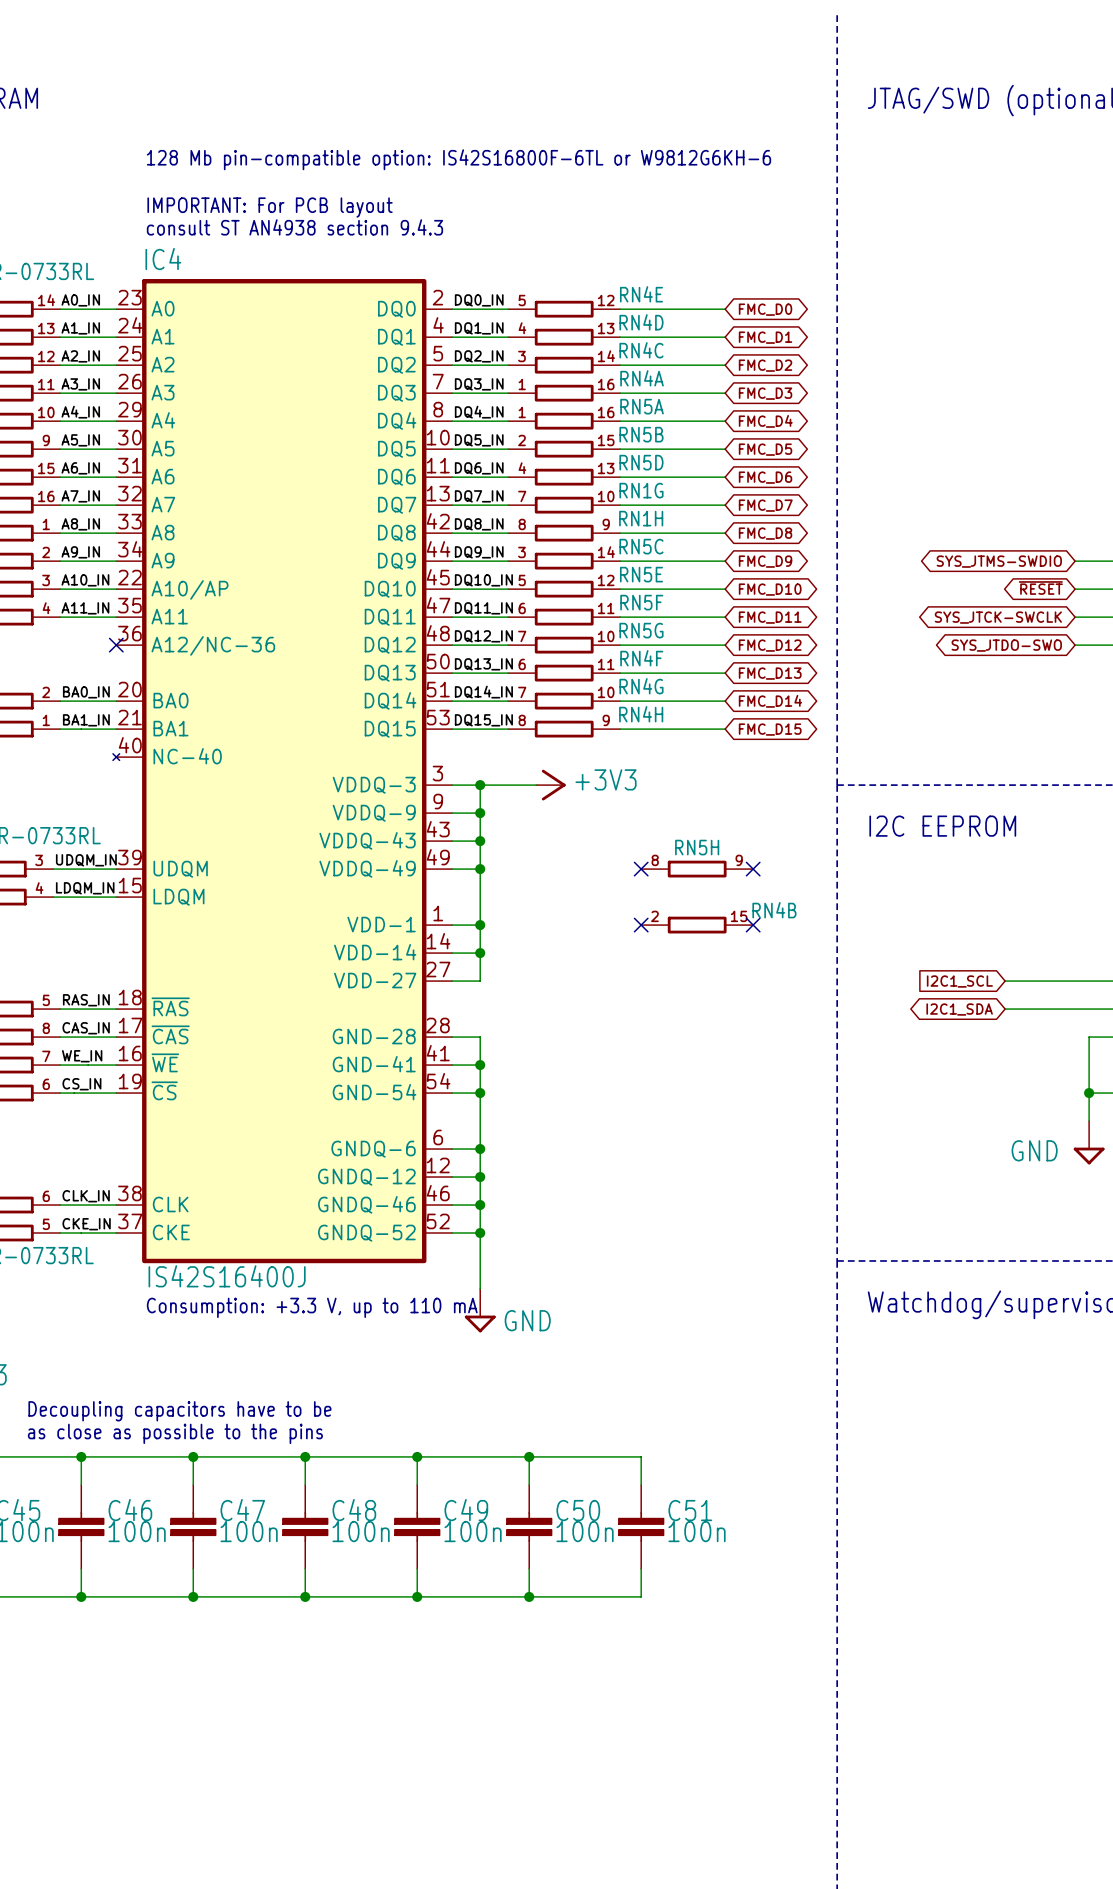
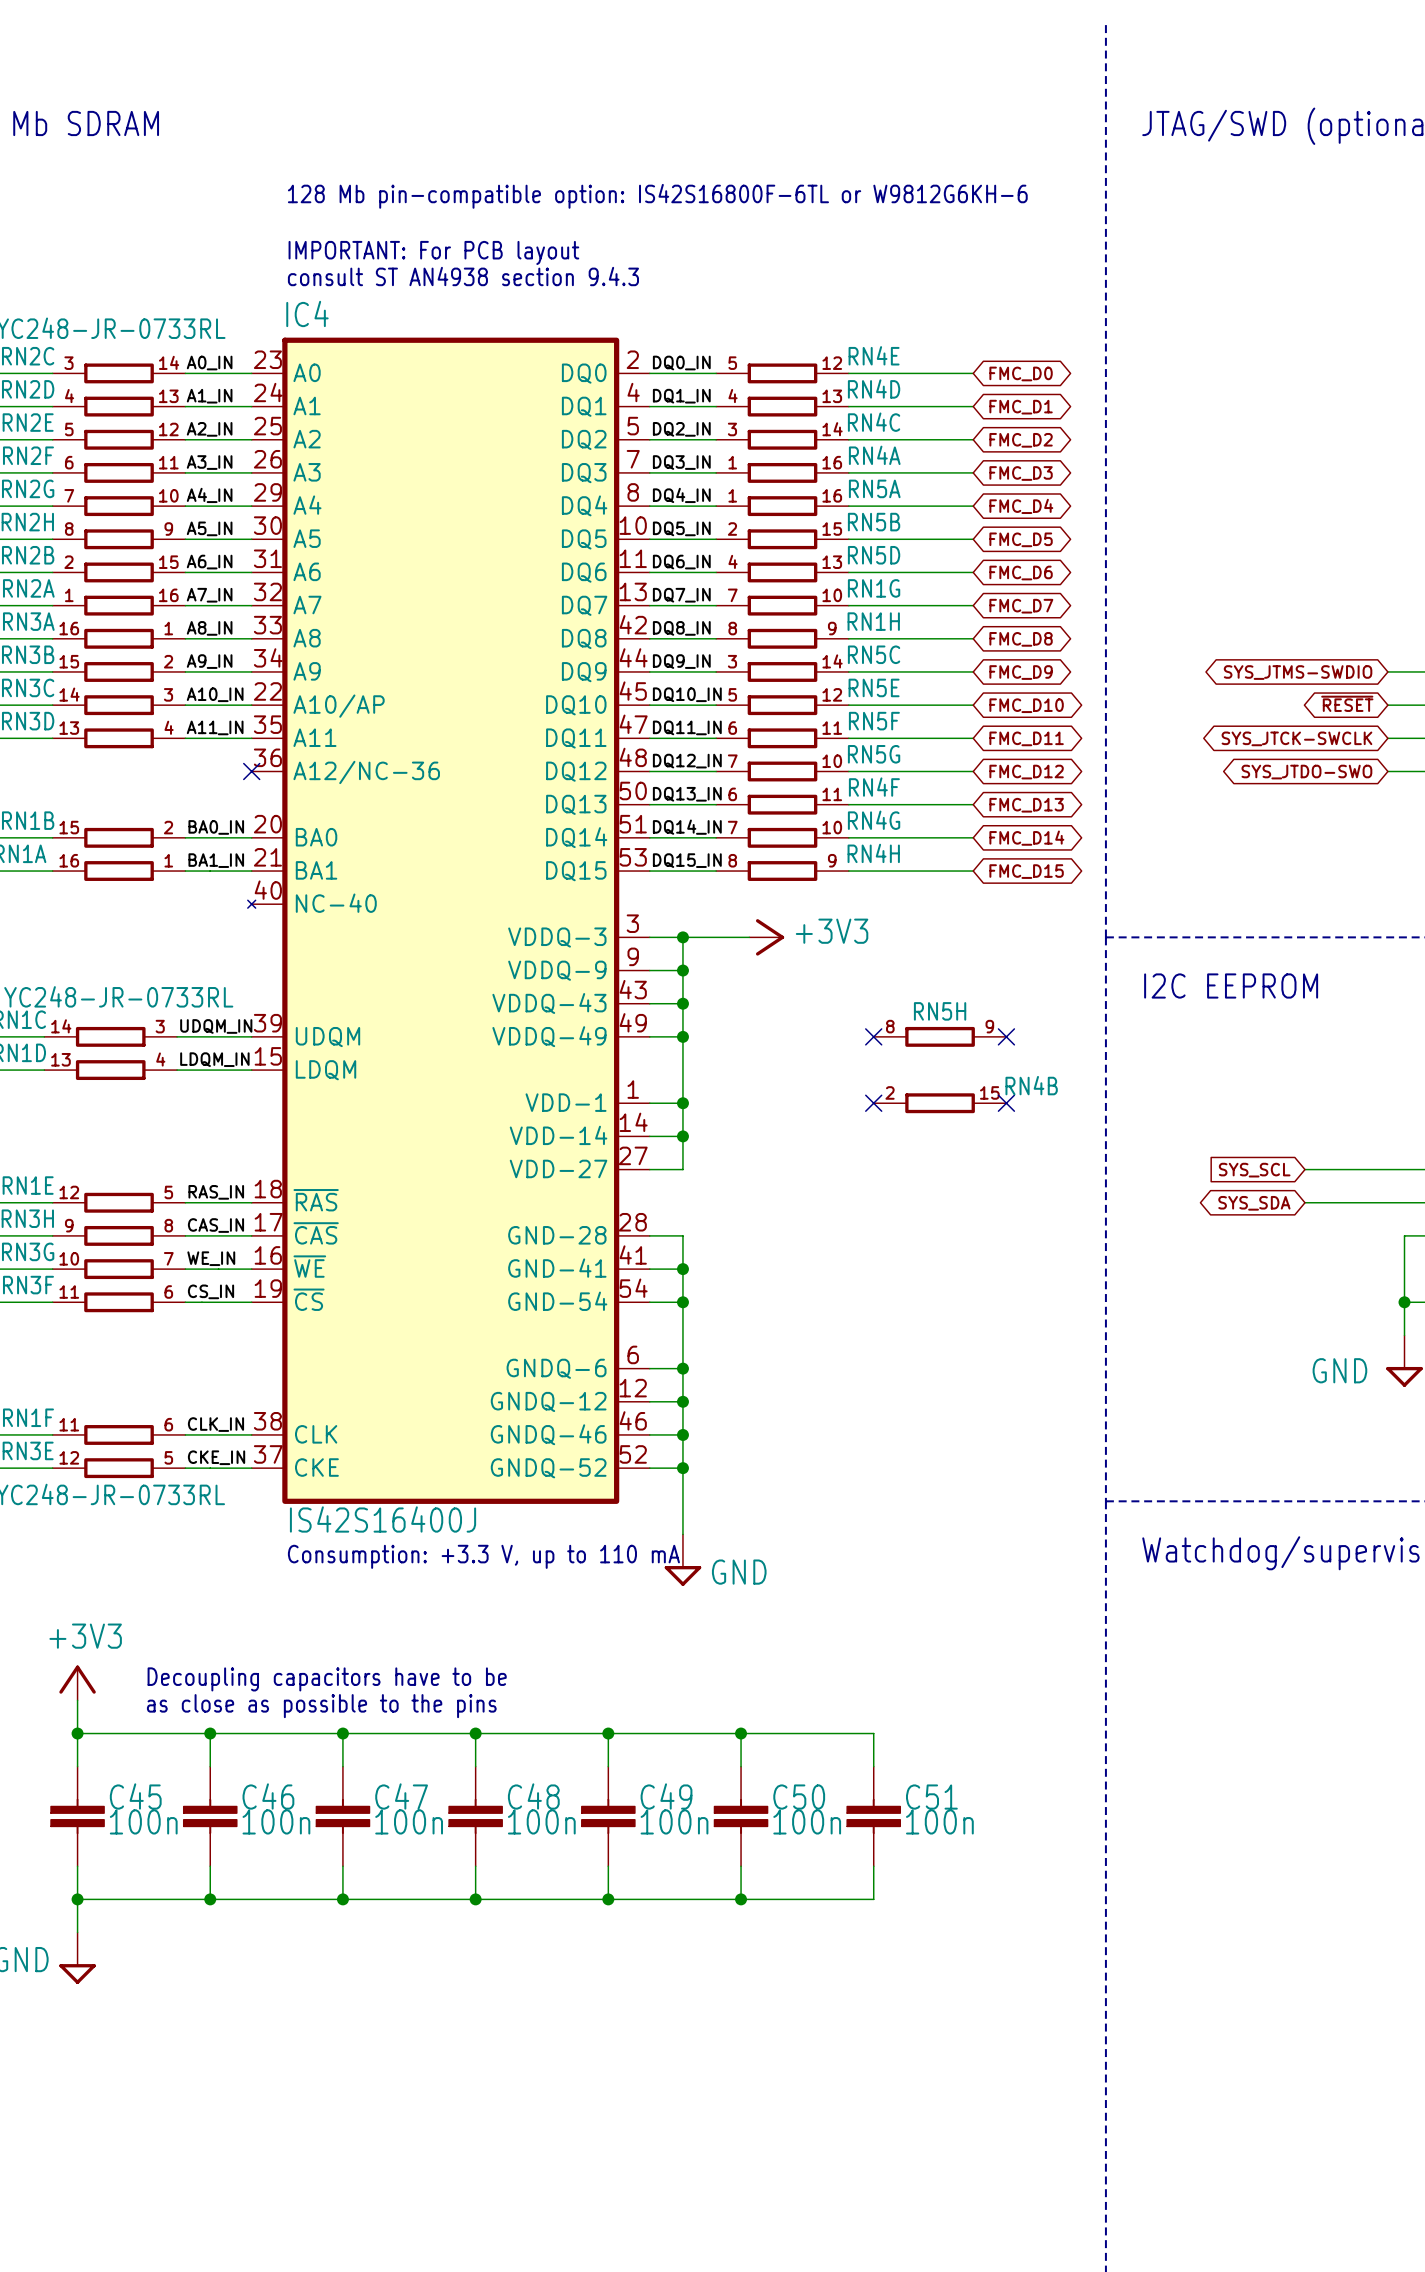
global label: I2C1_SCL (959, 981) -> SYS_SCL (1254, 1170)
global label: I2C1_SDA (959, 1009) -> SYS_SDA (1254, 1203)

